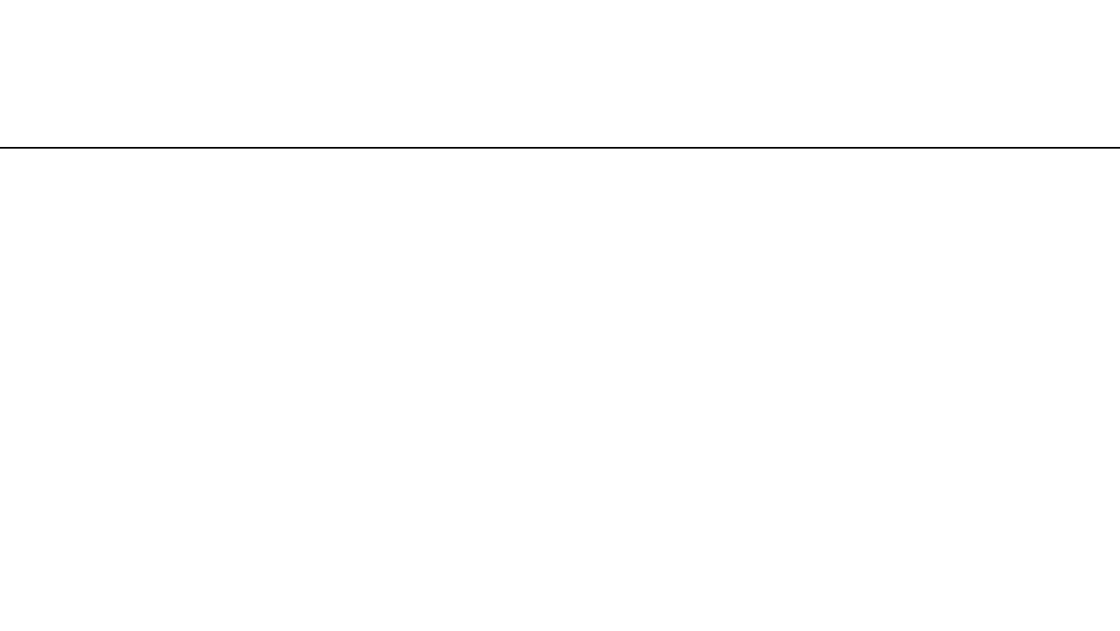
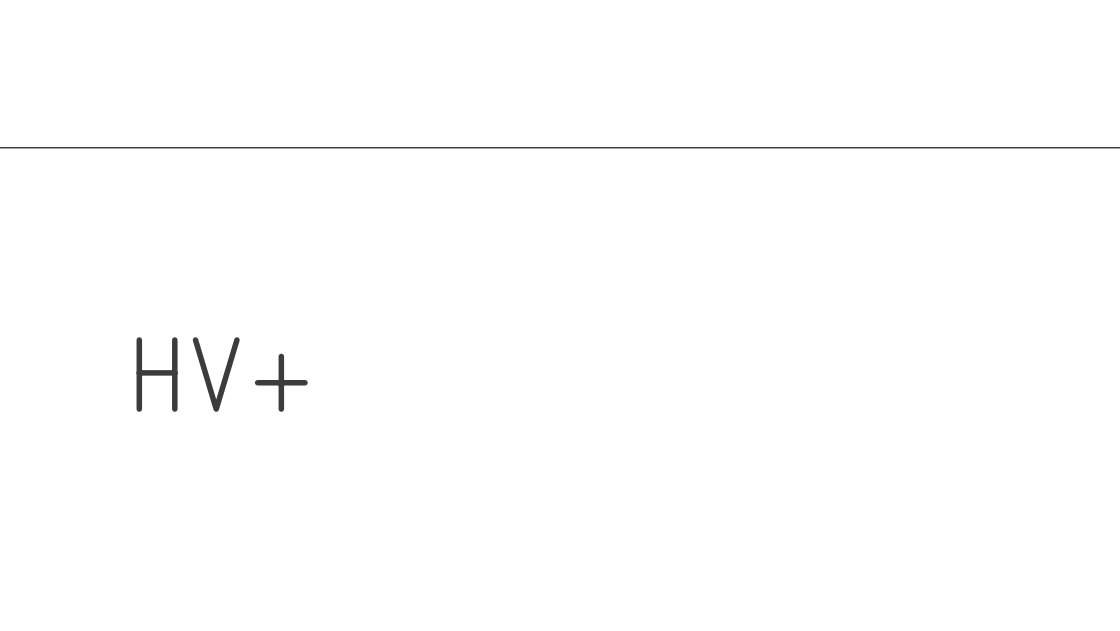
text: none -> HV+ (222, 374)

